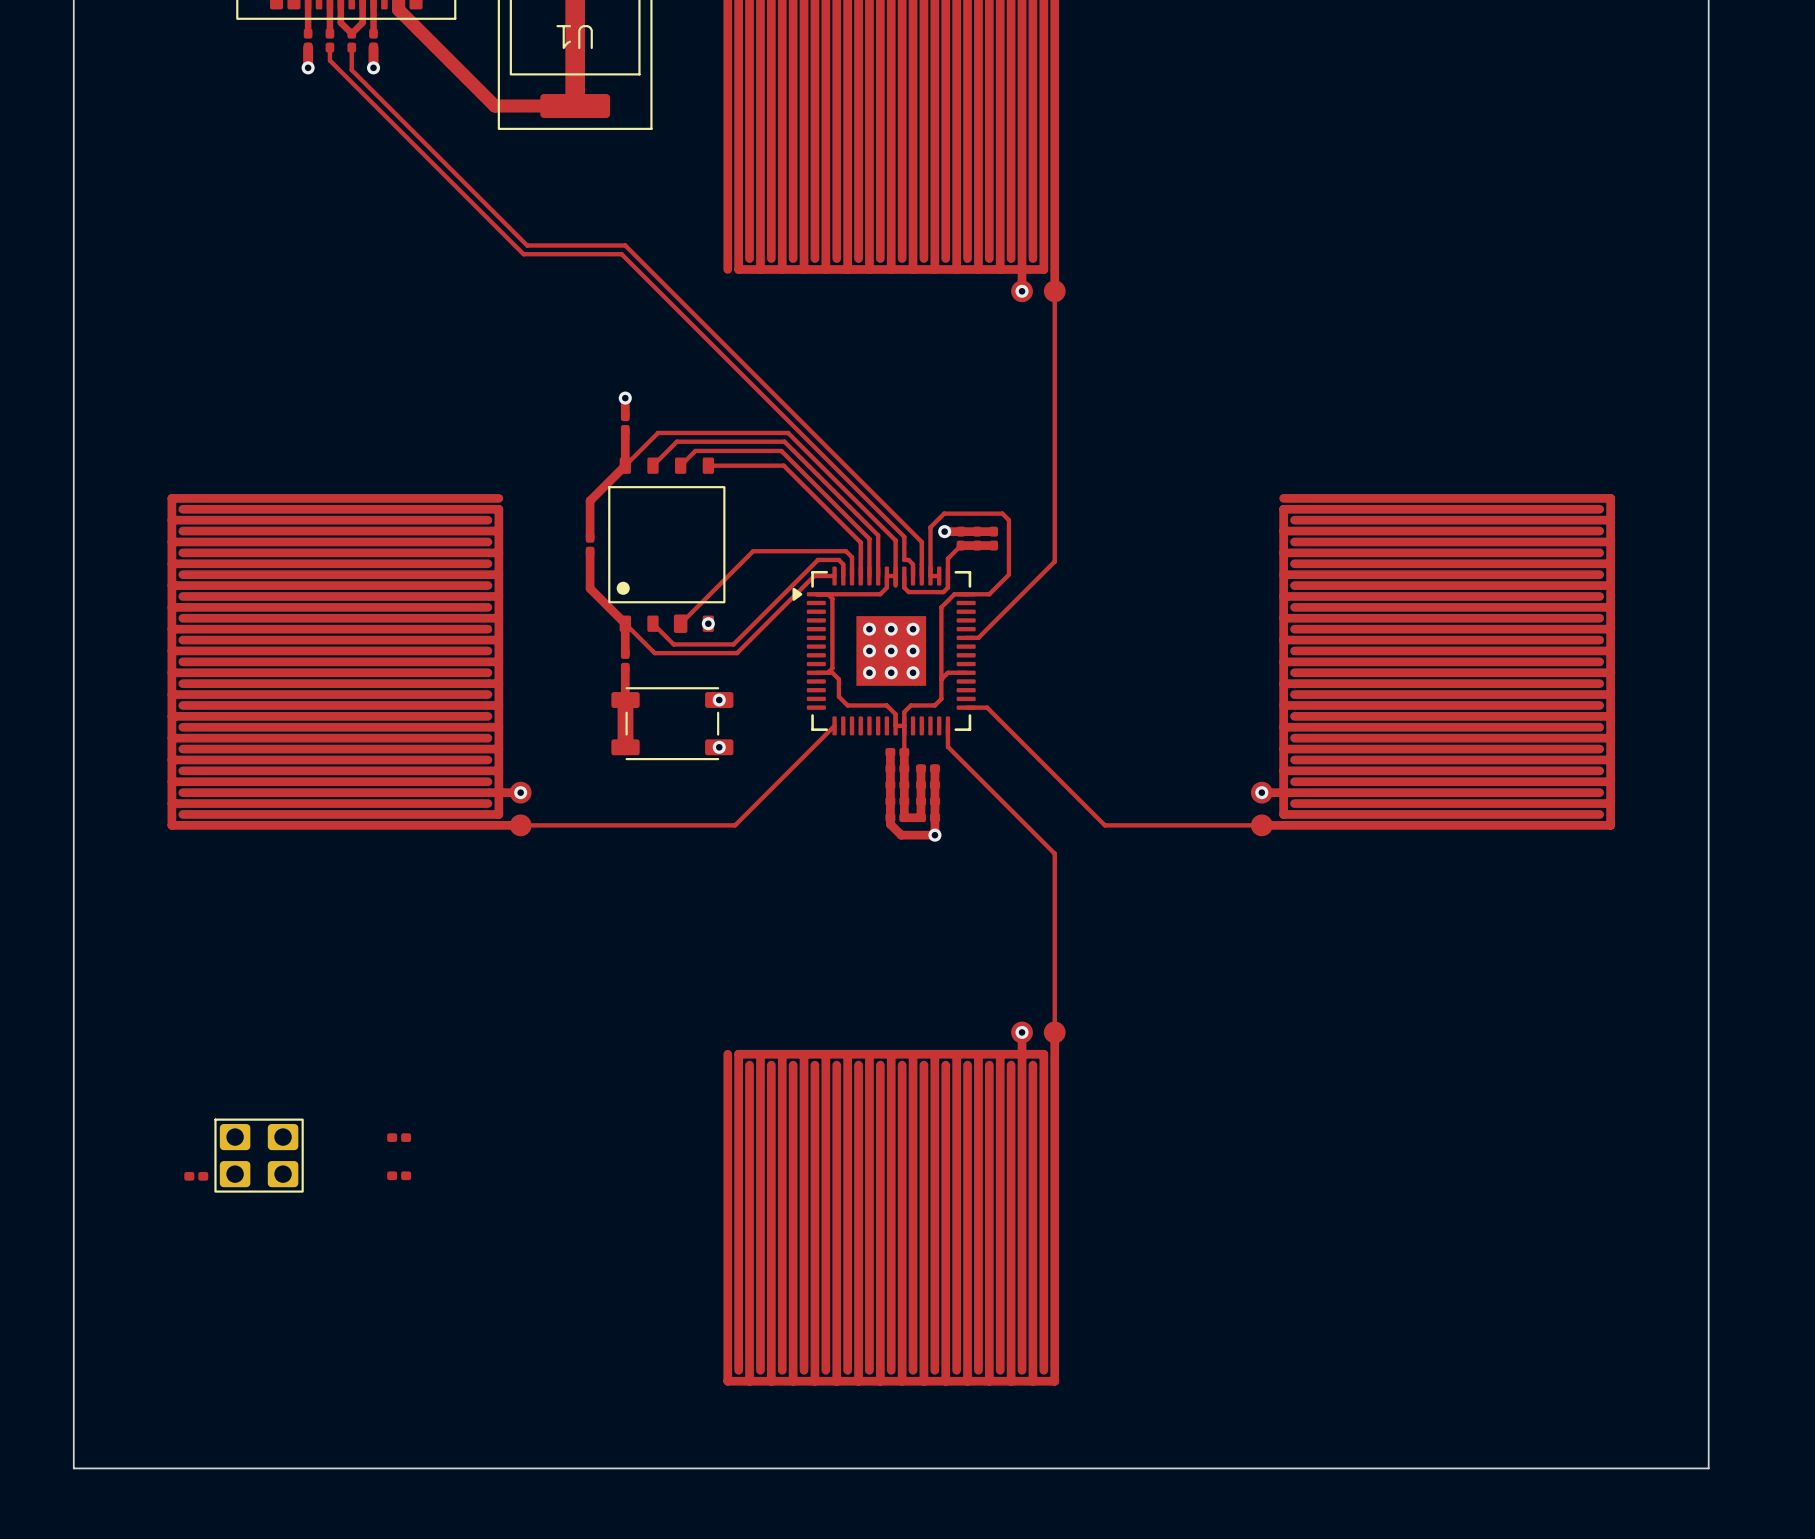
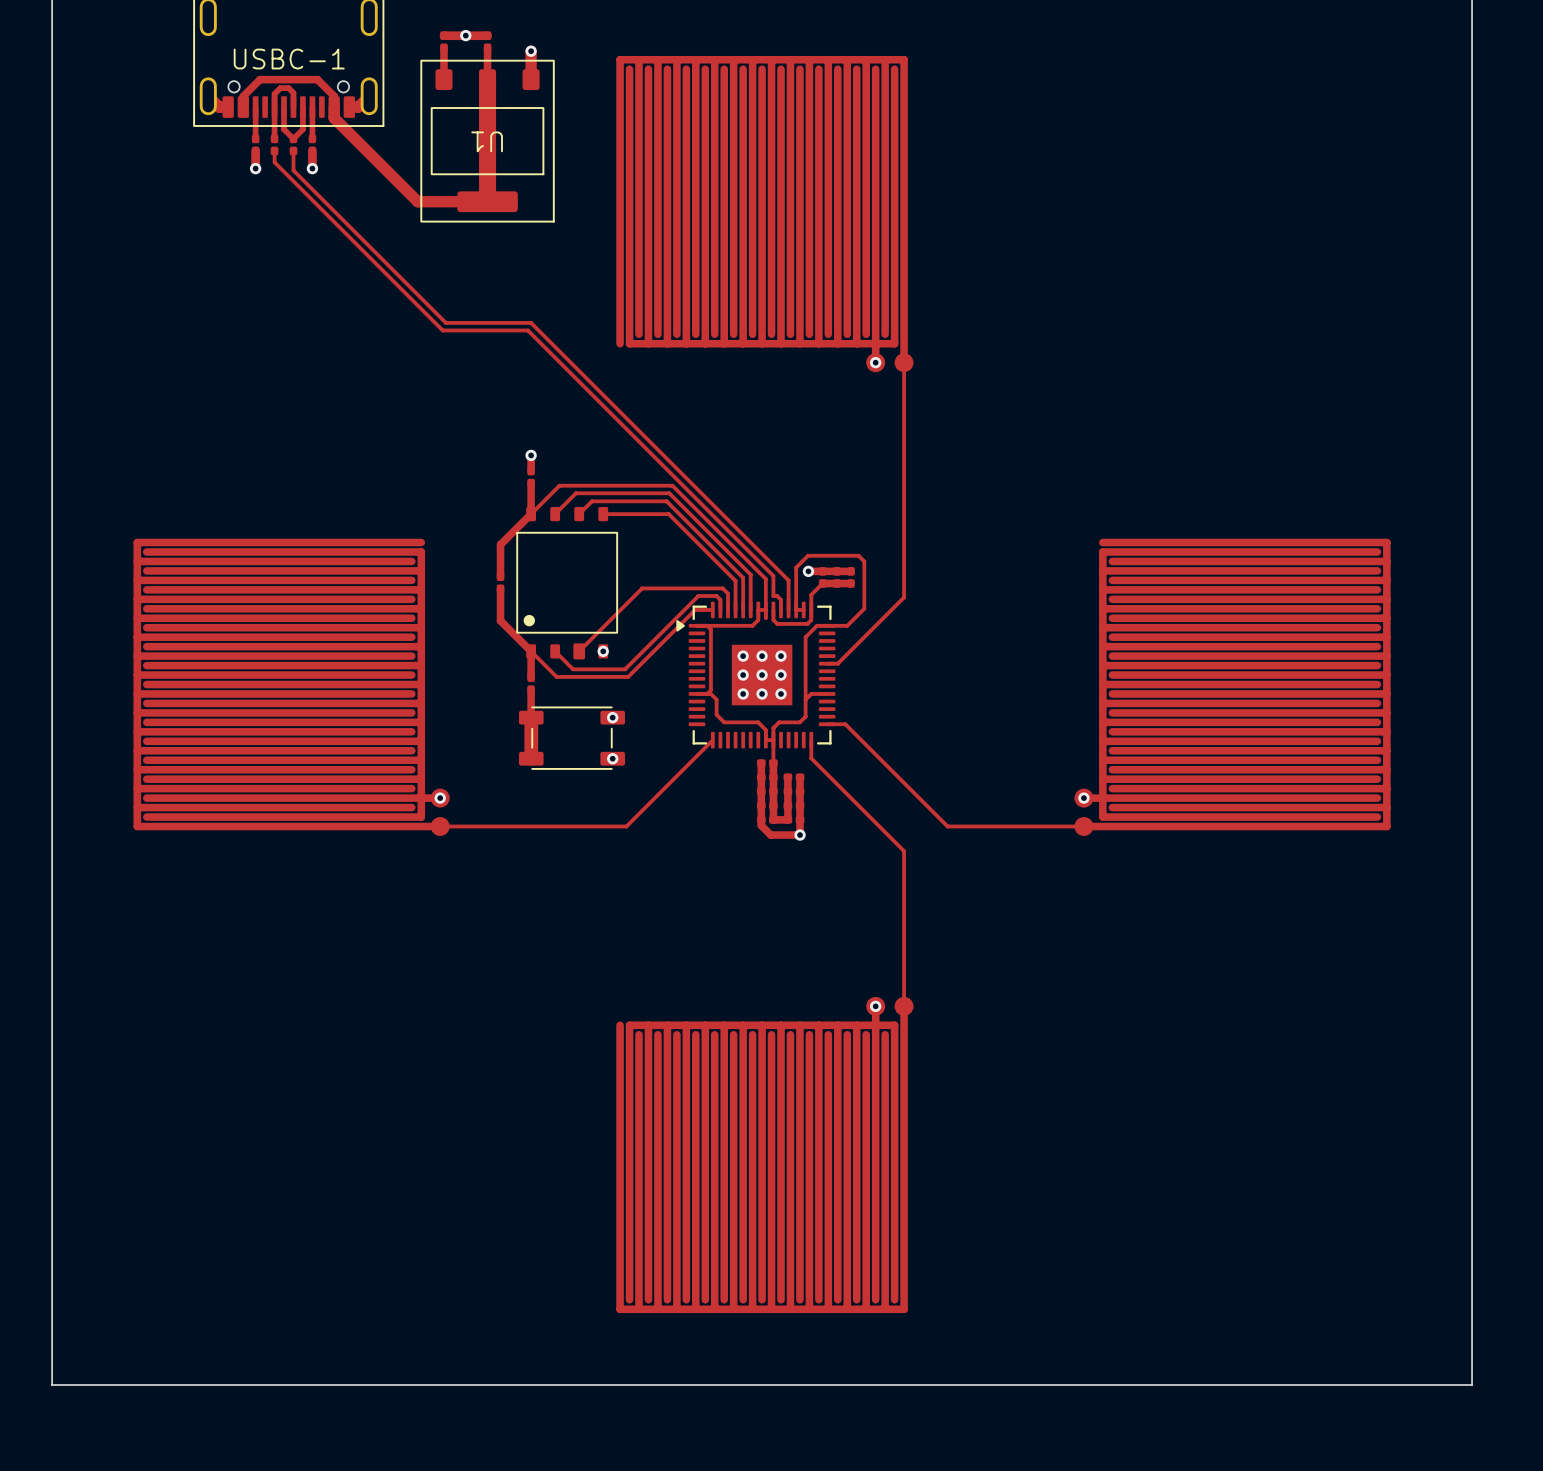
part: (399, 1137) -> none
part: (259, 1155) -> none
part: (399, 1175) -> none
part: (196, 1176) -> none

